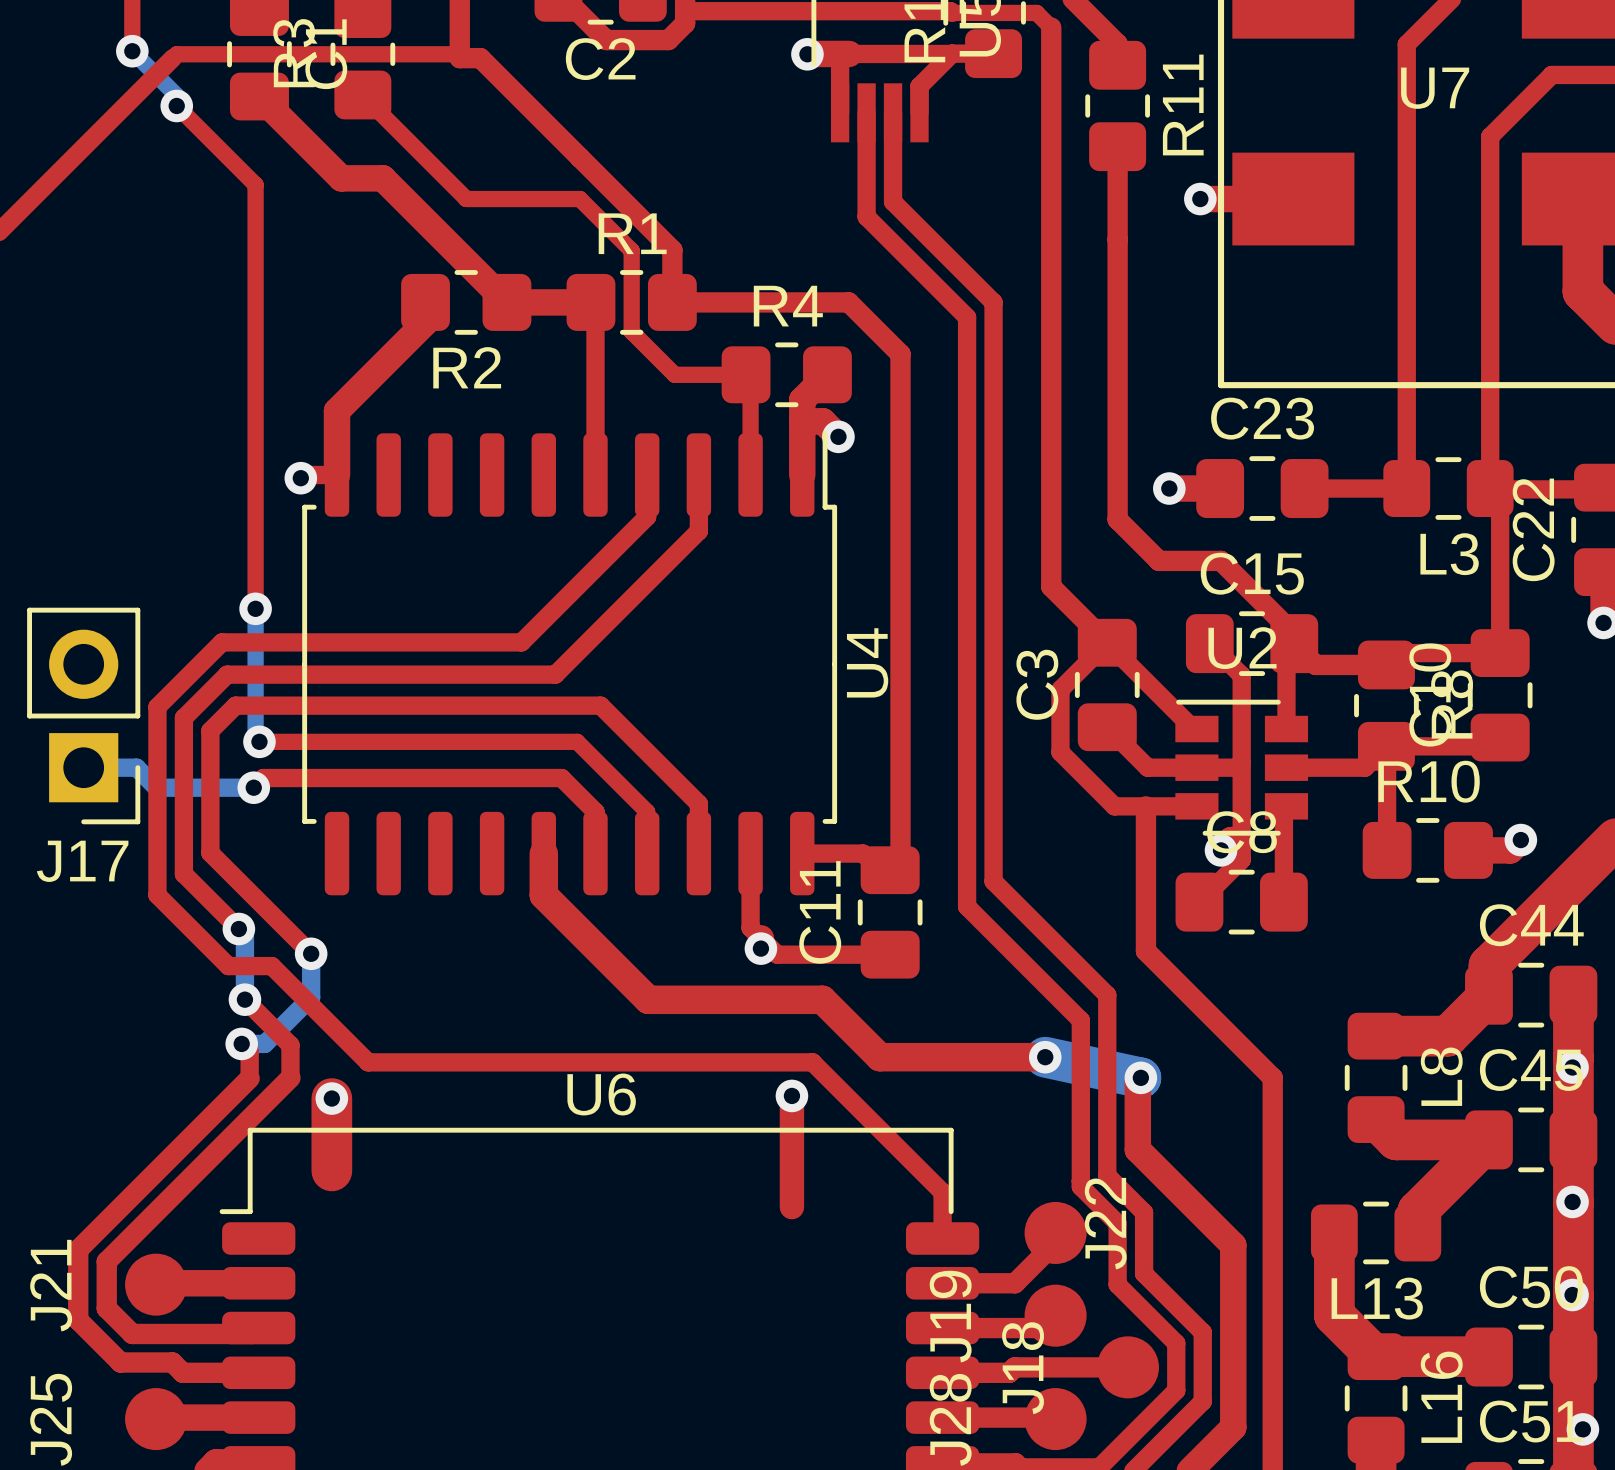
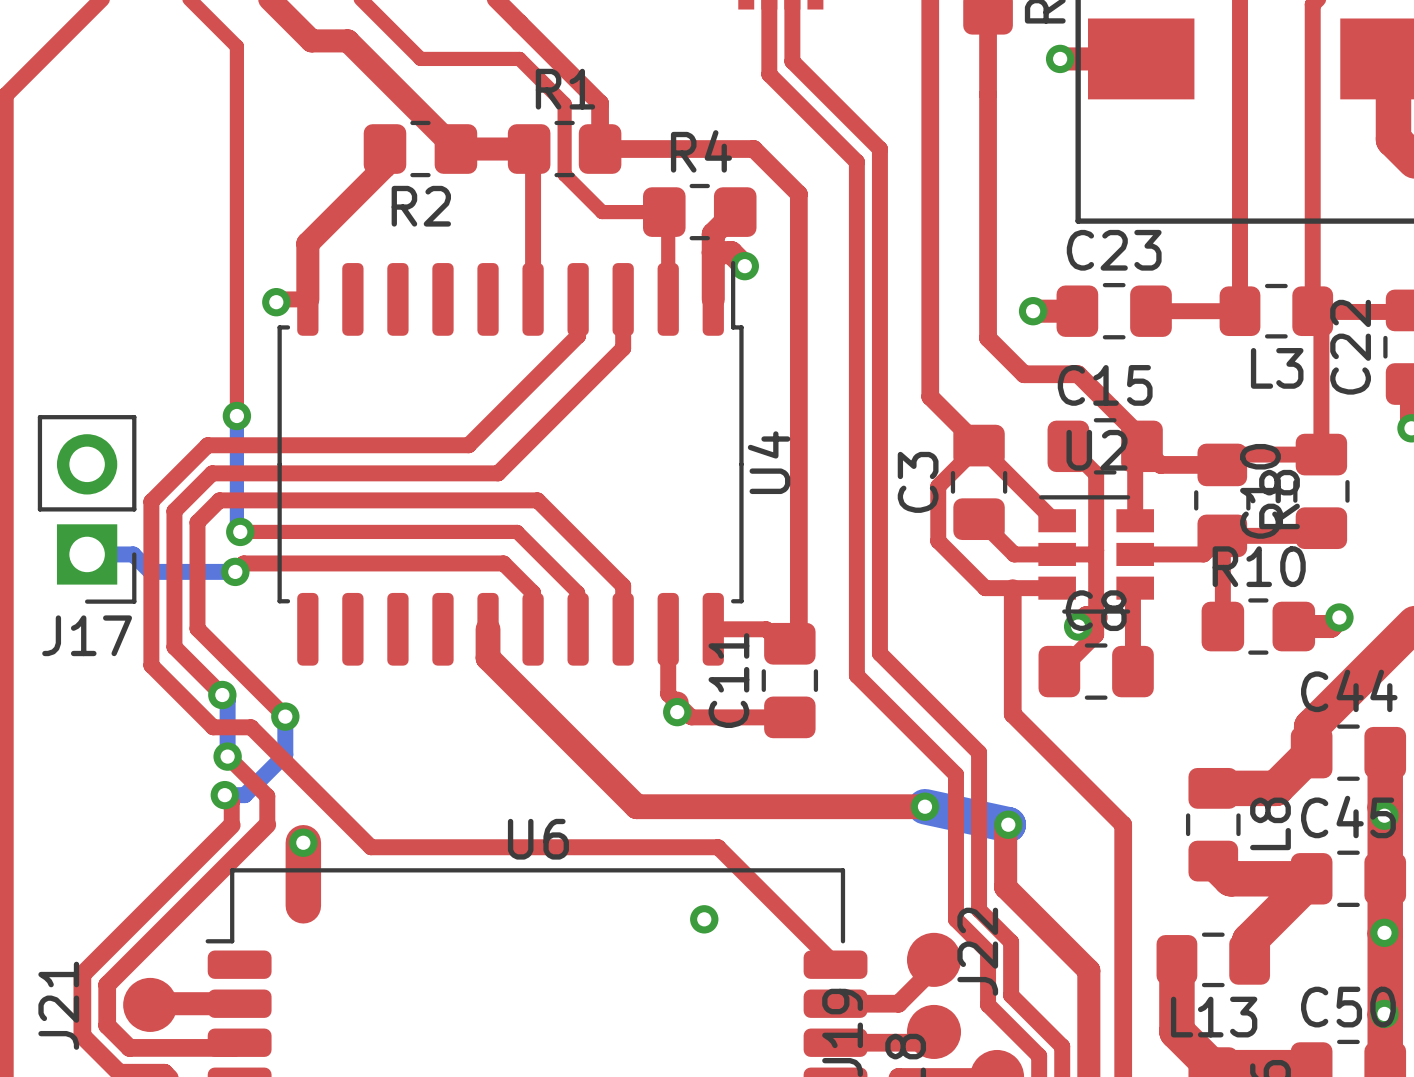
top track: (543, 886) (543, 895) (648, 999) (822, 999) (879, 1057) -> (488, 658) (636, 806) (780, 806)
top track: (368, 1062) (812, 1062) (942, 1192) (942, 1232) -> (335, 811) (371, 847) (718, 847) (835, 964)
top track: (791, 1095) (791, 1207) -> none
via position: (791, 1095) -> (704, 919)

